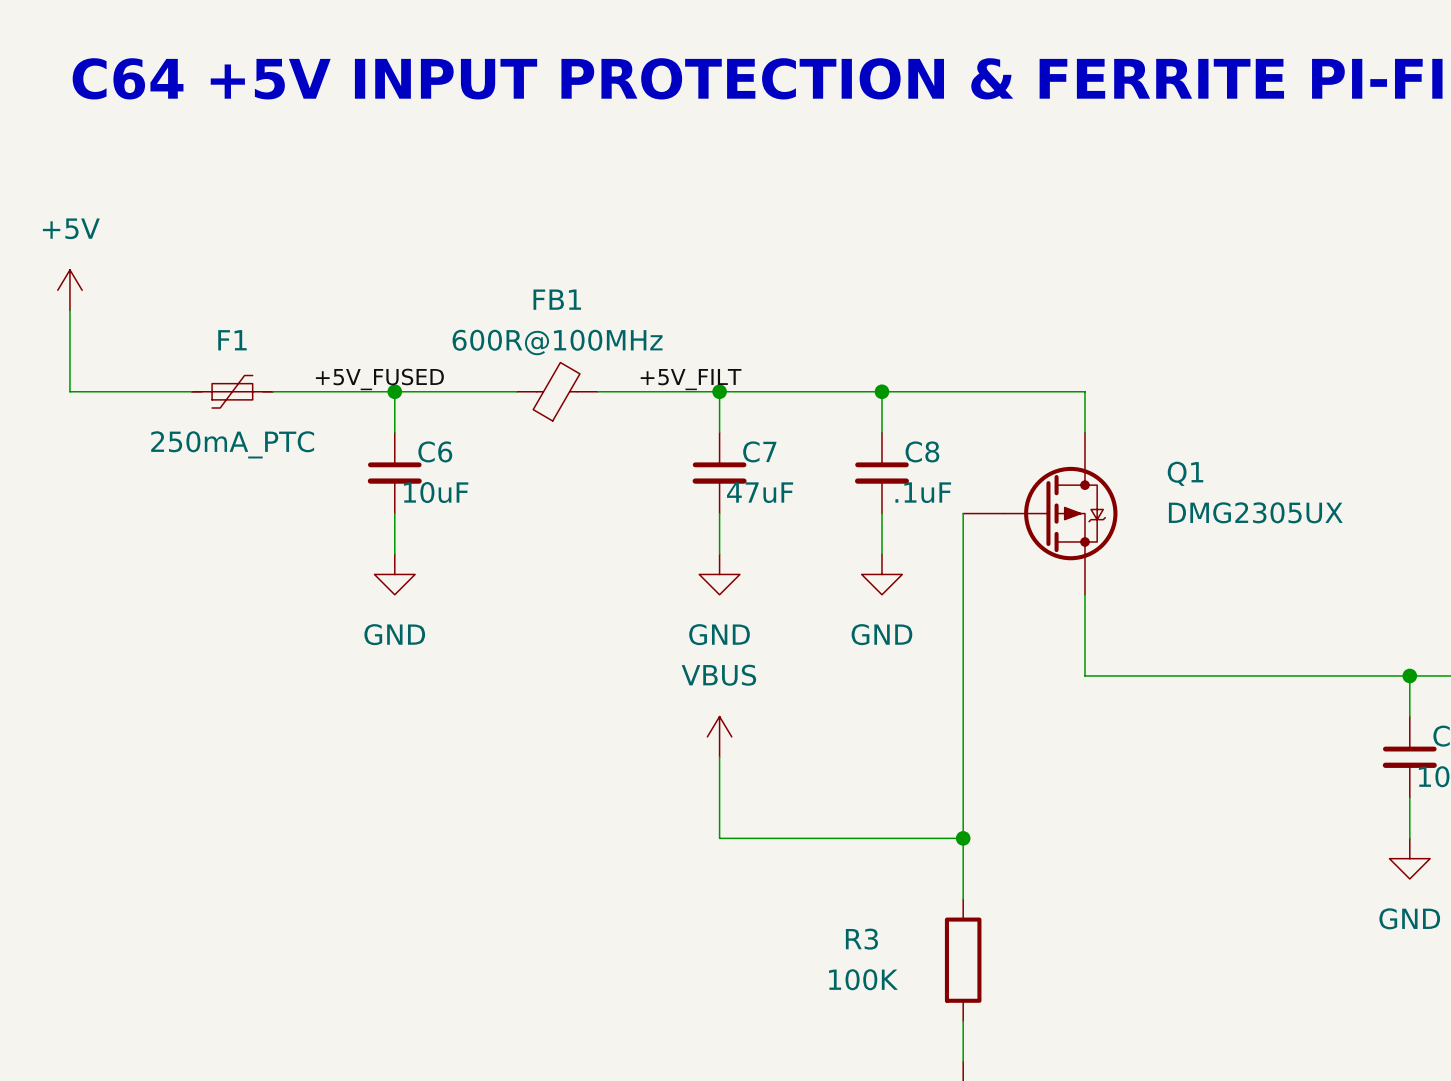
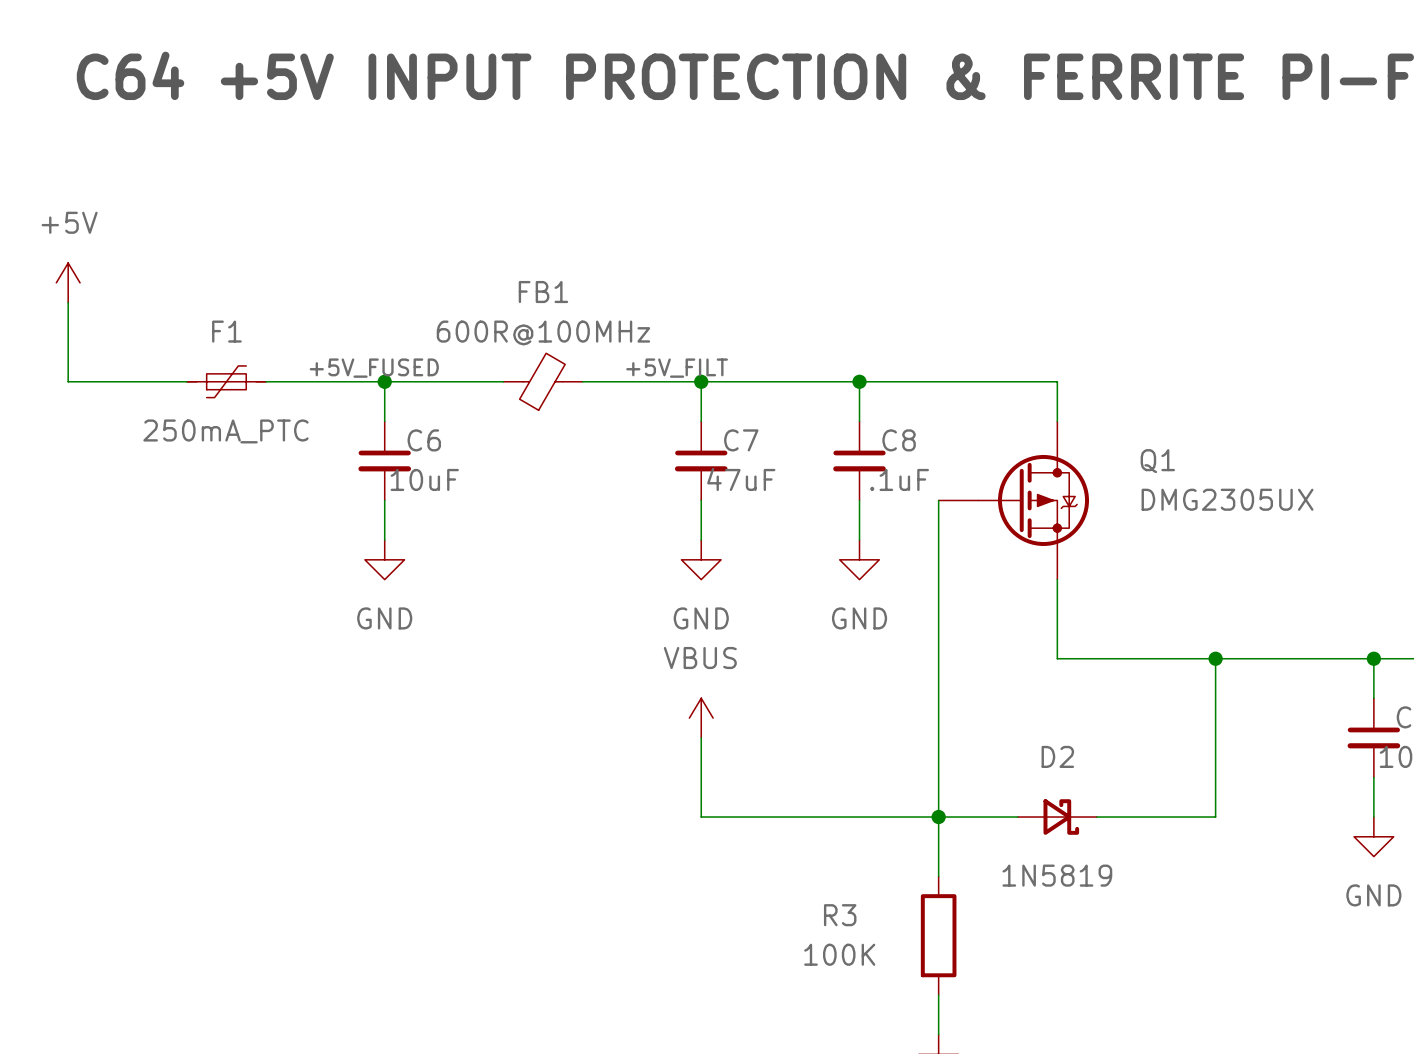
wire: none -> (1215, 658) (1215, 817) (1096, 817)
junction: none -> (1215, 658)
wire: none -> (938, 817) (1017, 817)
D2: none -> 1N5819 (1057, 817)

